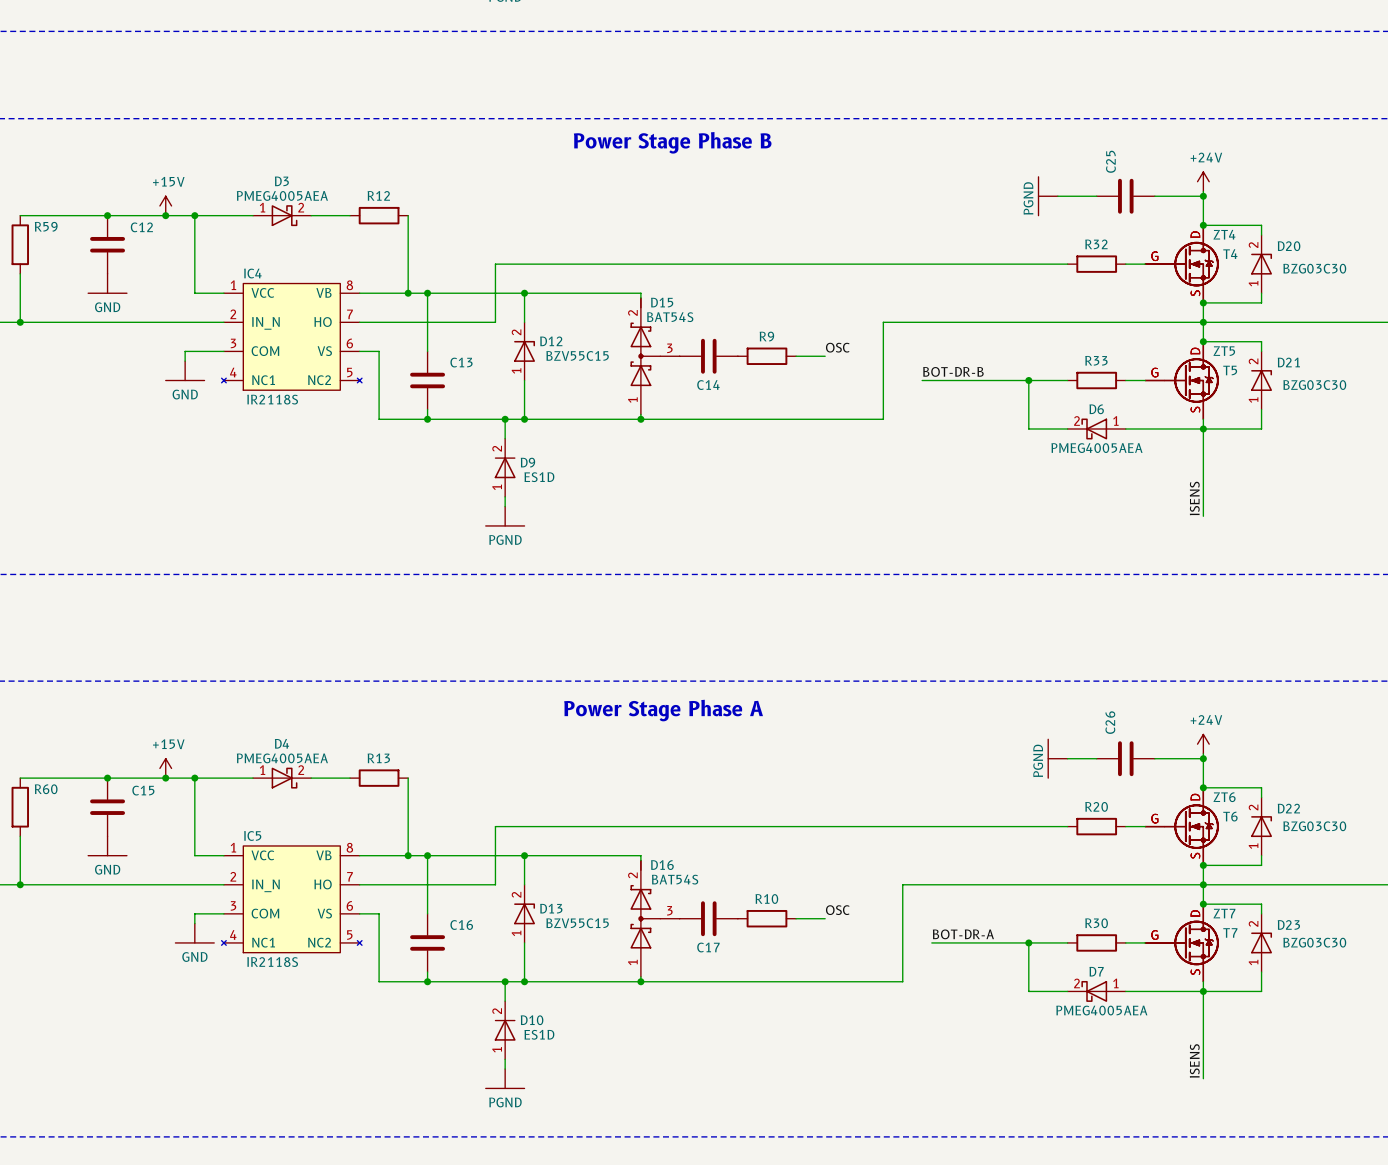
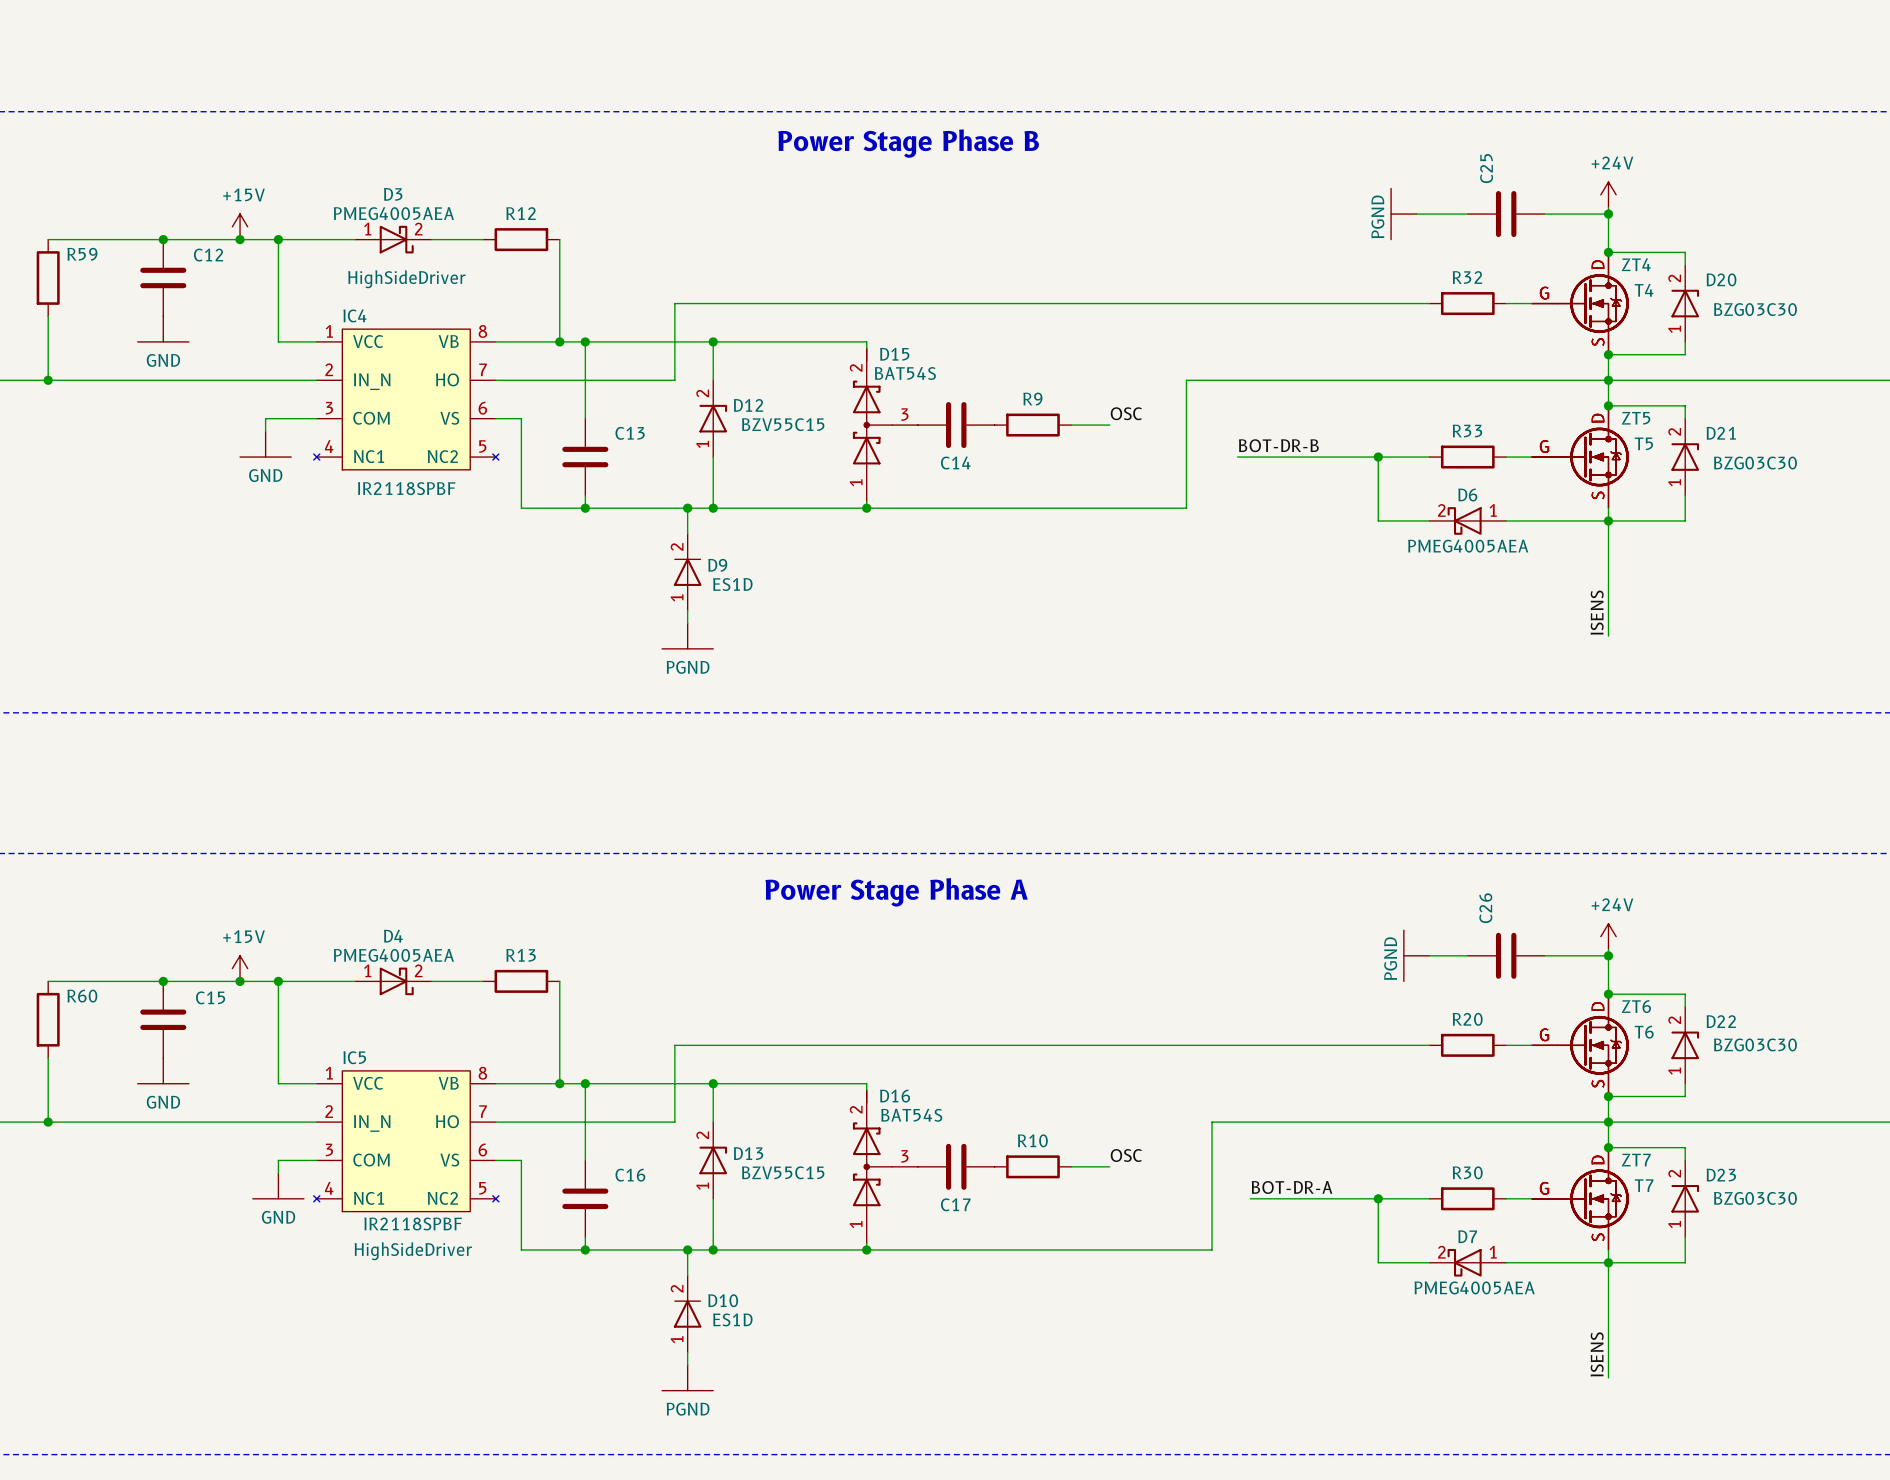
IC4 value: IR2118S (272, 399) -> HighSideDriver (406, 279)
IC4 text: none -> IR2118SPBF (406, 488)
IC5 value: IR2118S (272, 962) -> HighSideDriver (413, 1251)
IC5 text: none -> IR2118SPBF (413, 1223)

